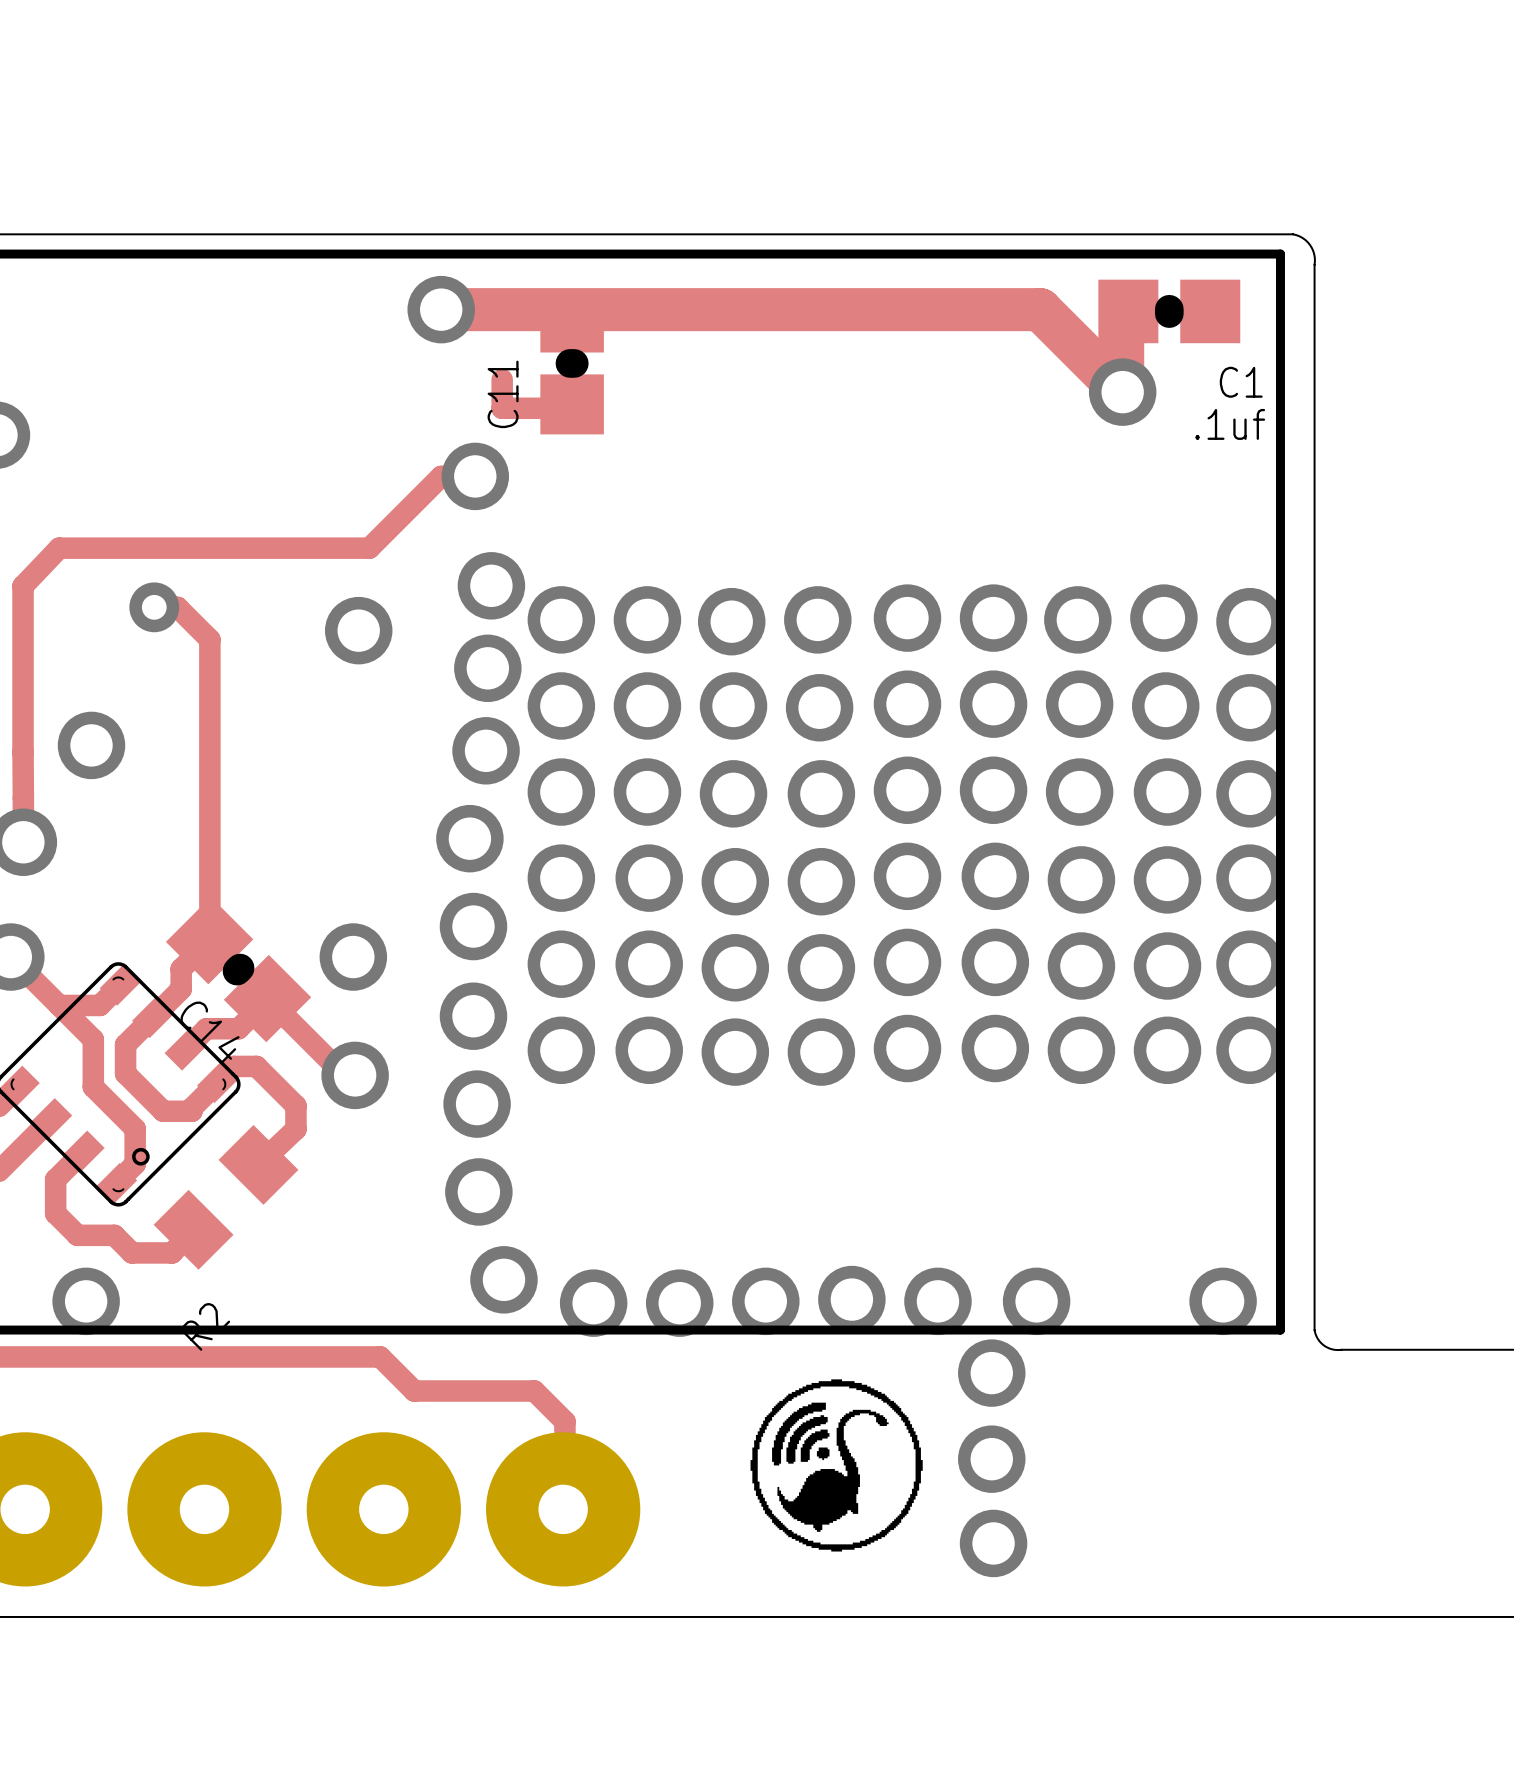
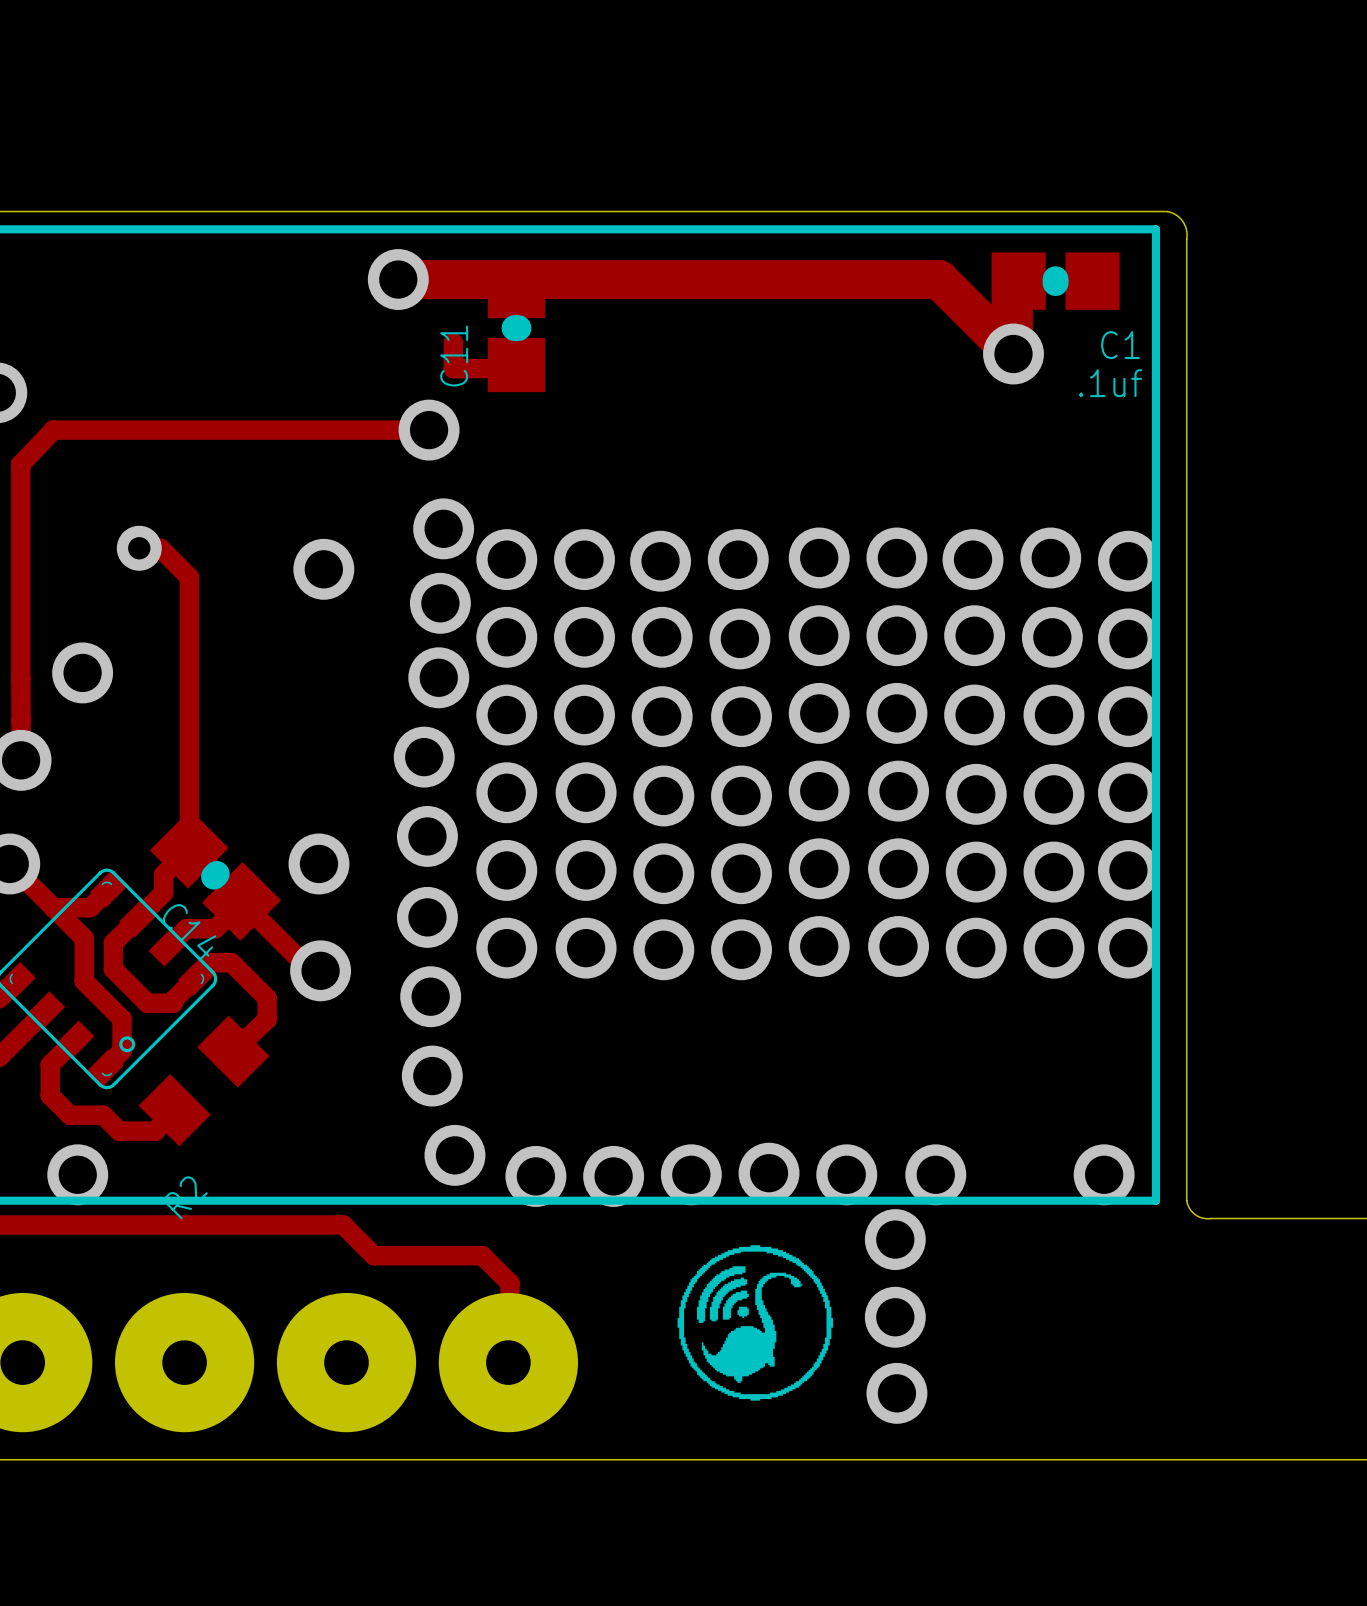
track: (441, 476) (369, 548) (59, 548) (23, 586) -> (398, 430) (53, 430) (20, 464) (20, 529)

